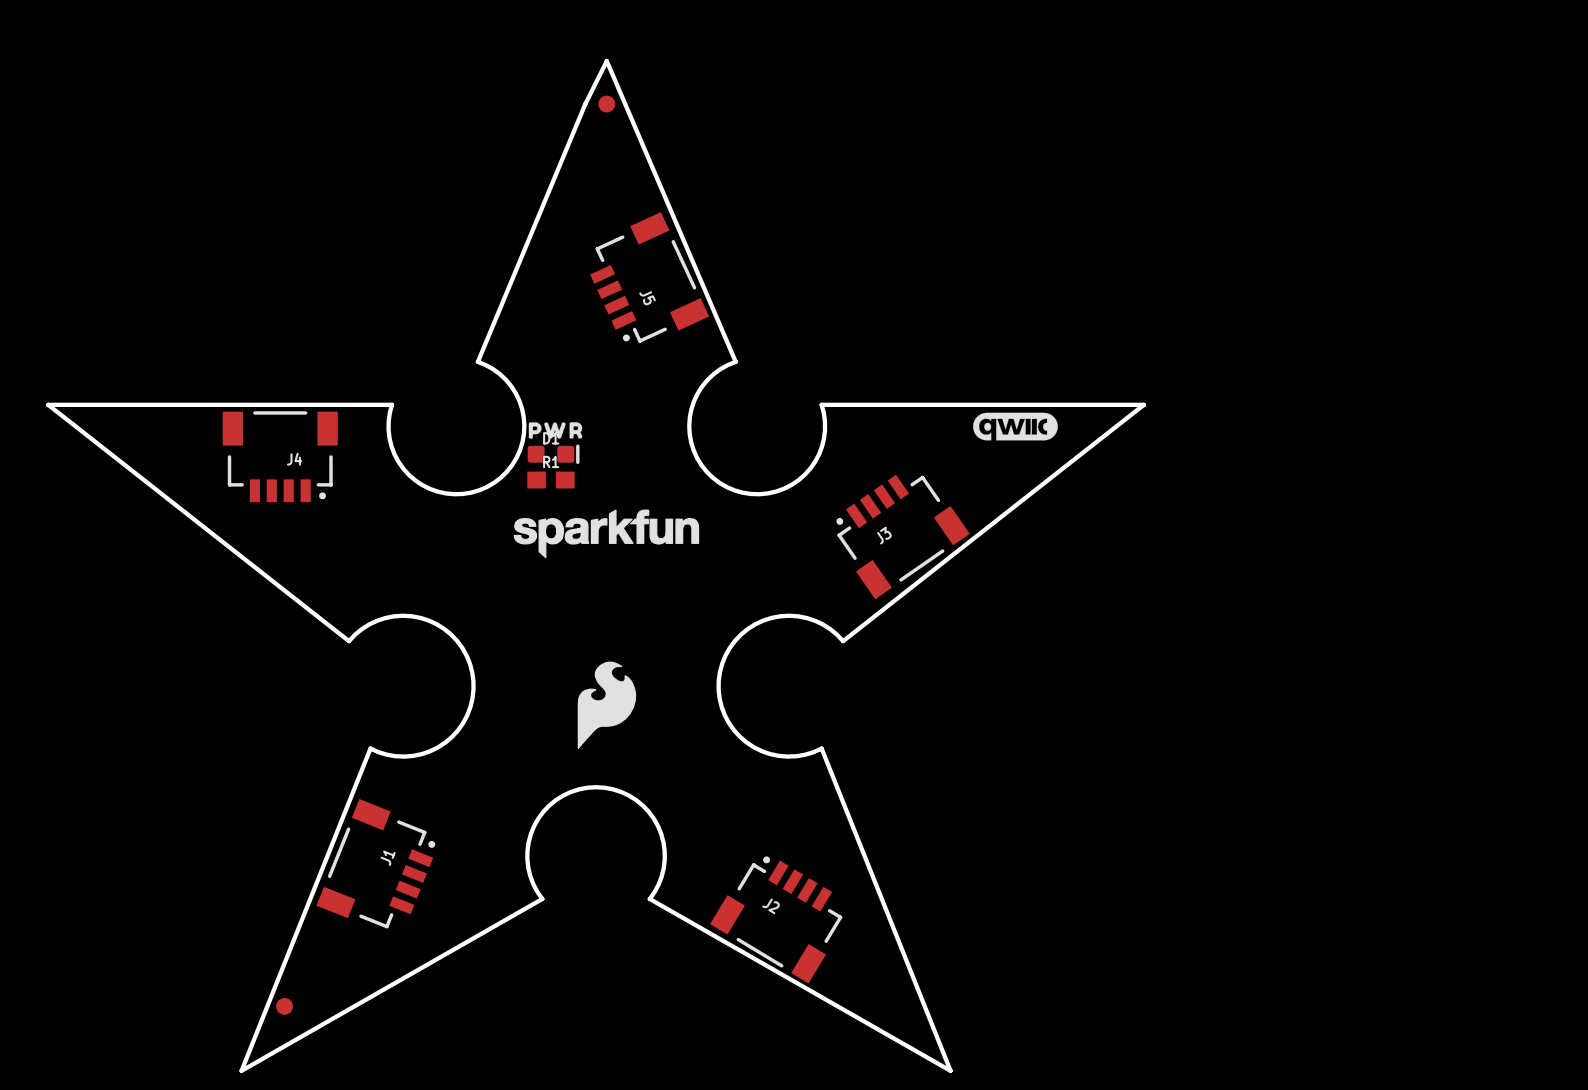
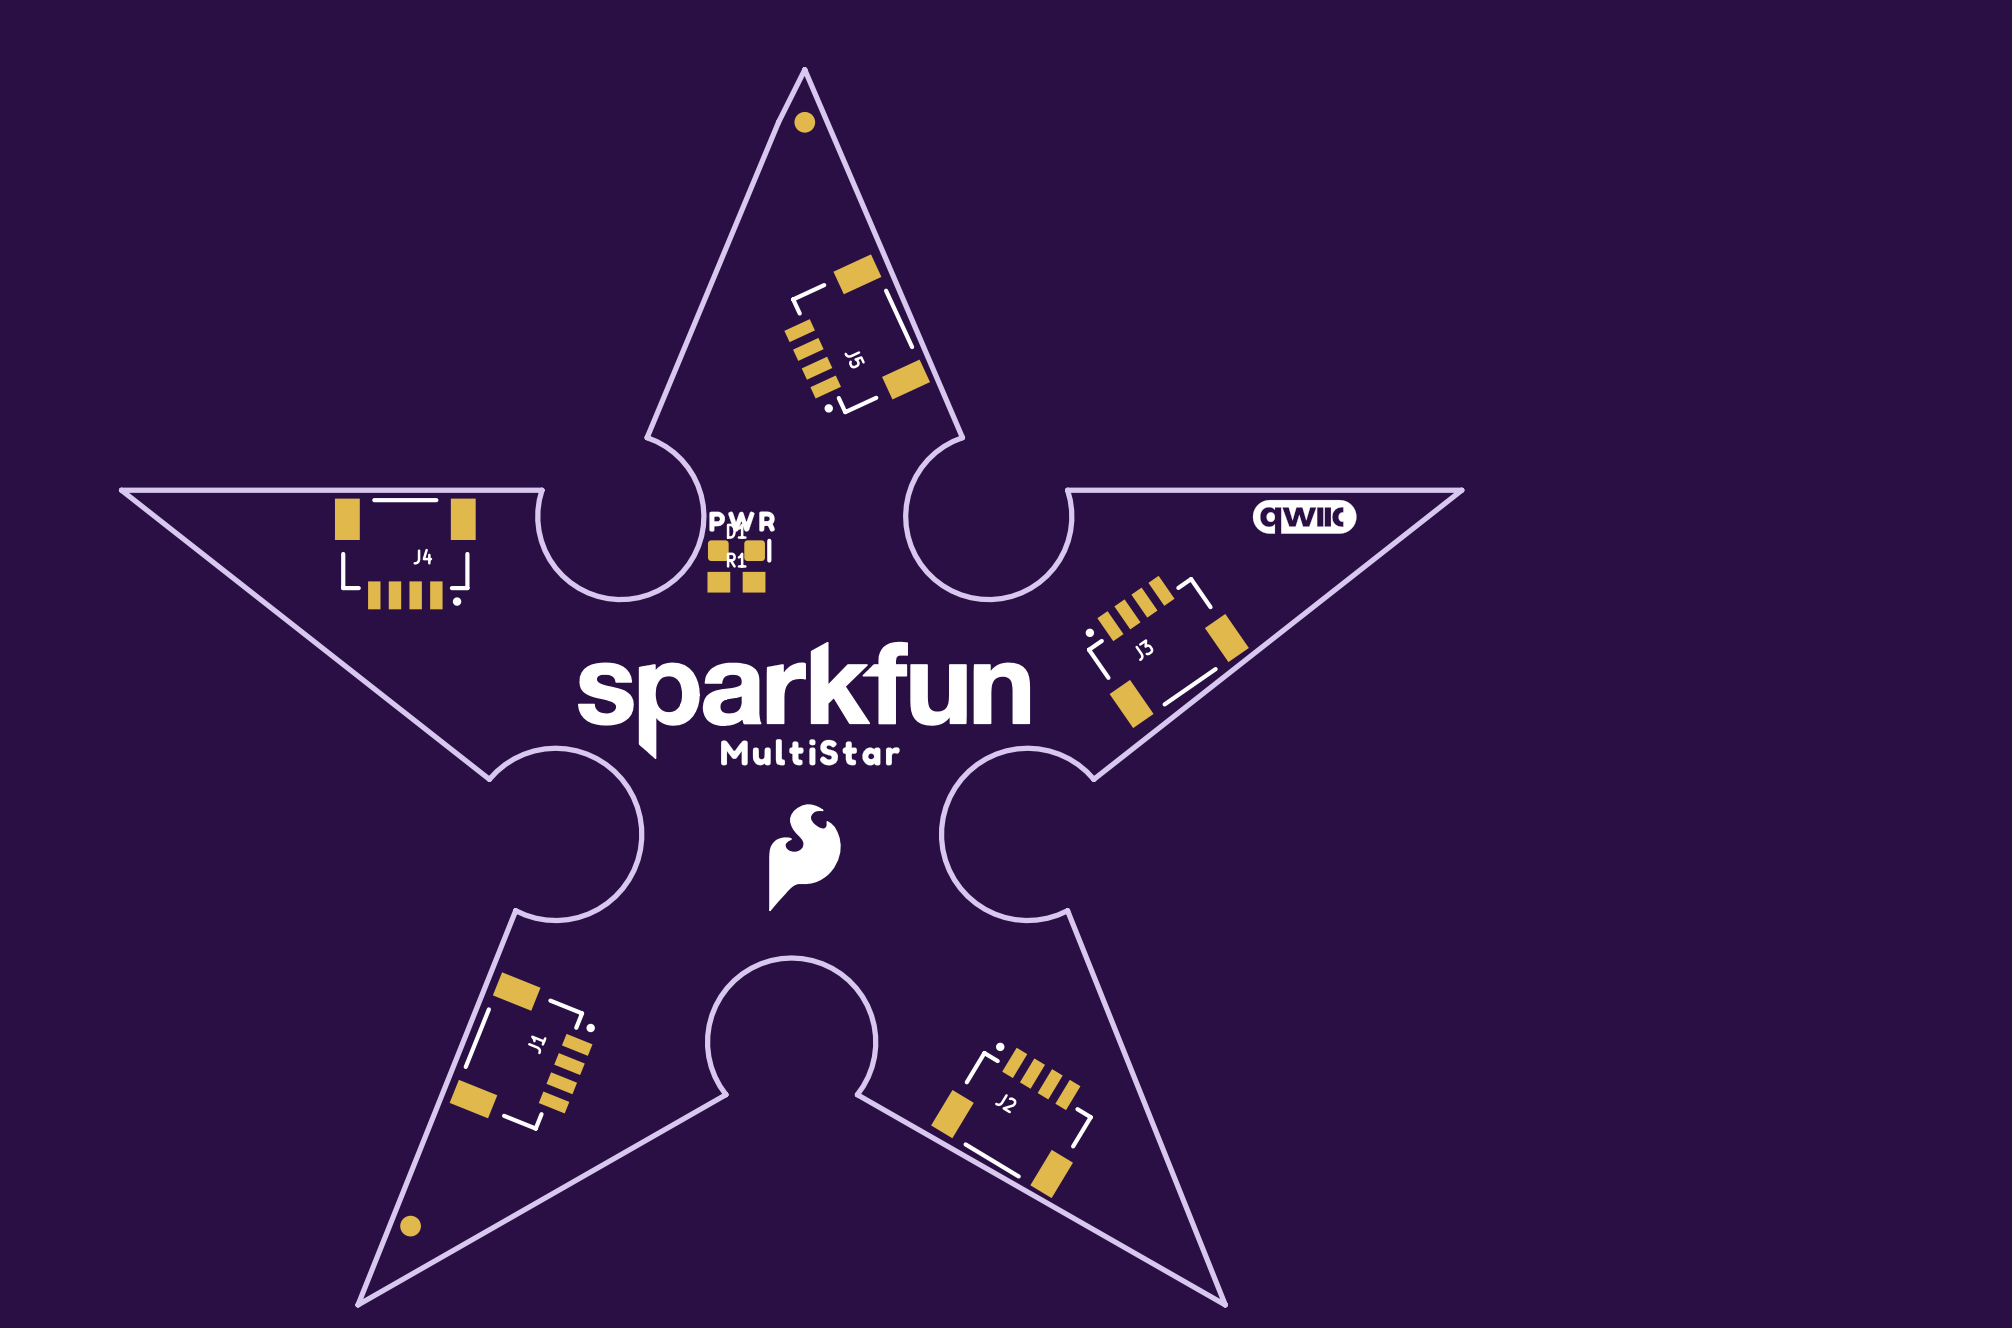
drawing: [513, 509, 700, 559] -> none
drawing: none -> [577, 641, 1031, 766]

